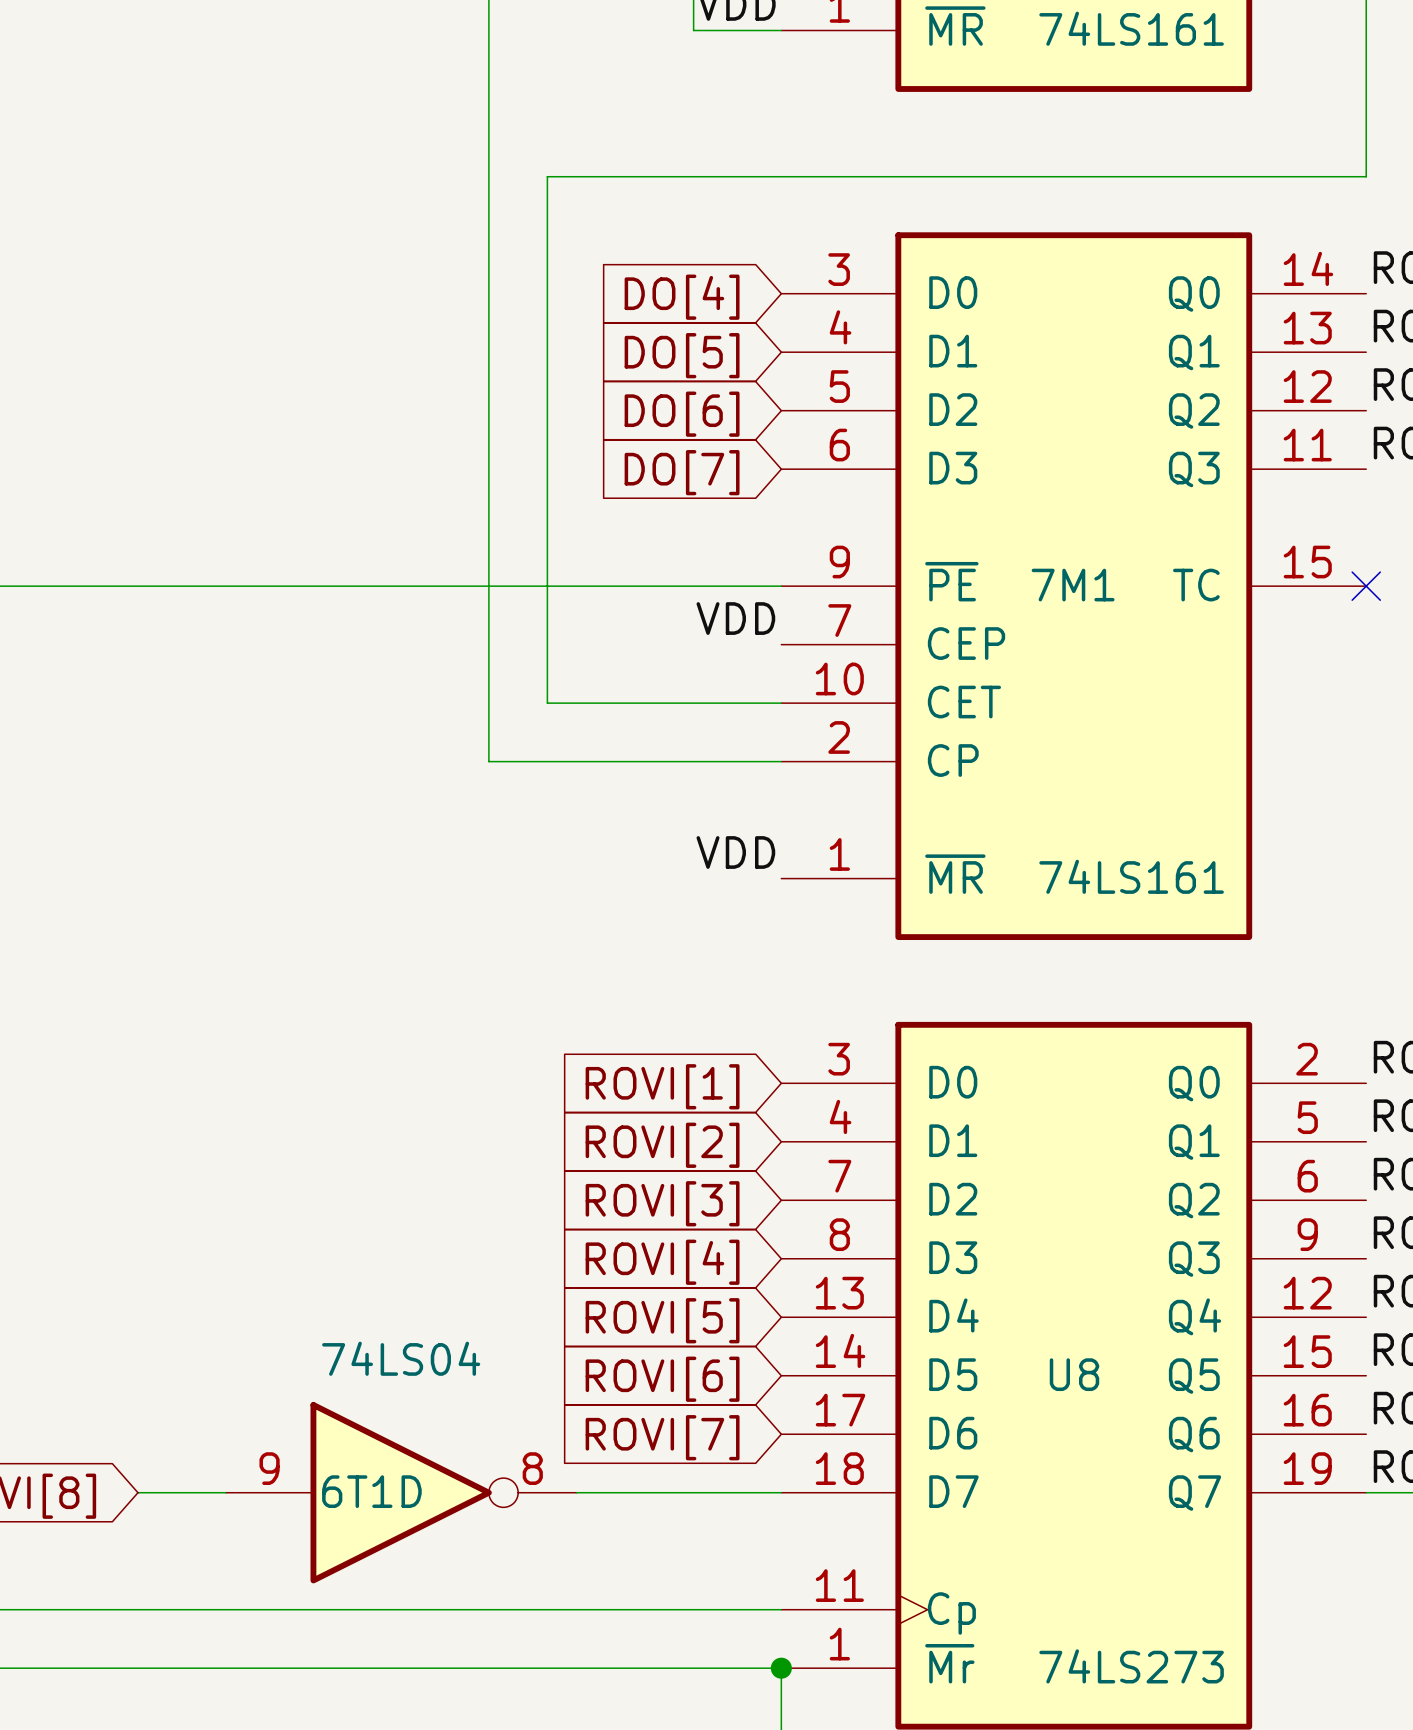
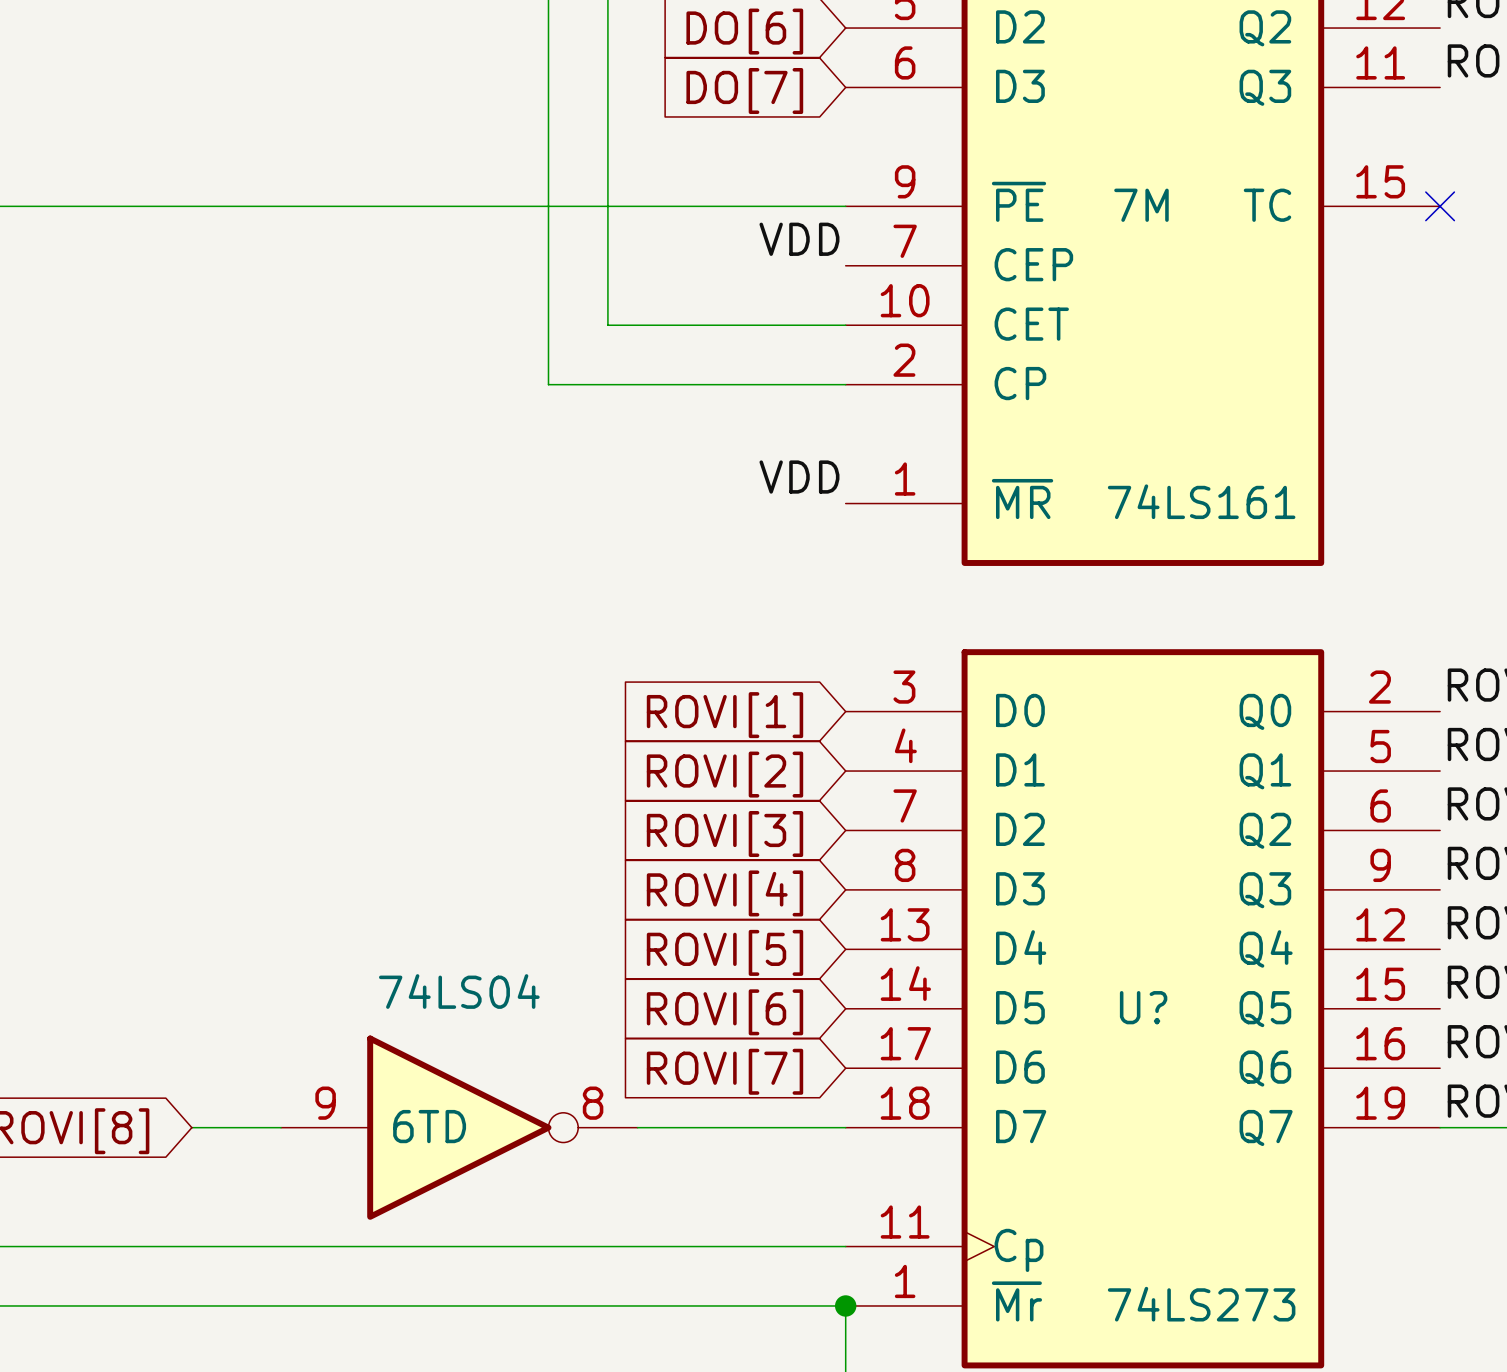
7M1 name: 7M1 (1073, 585) -> 7M (1141, 205)
U8 name: U8 (1074, 1374) -> U? (1143, 1007)
6T1D name: 6T1D (371, 1491) -> 6TD (429, 1126)

